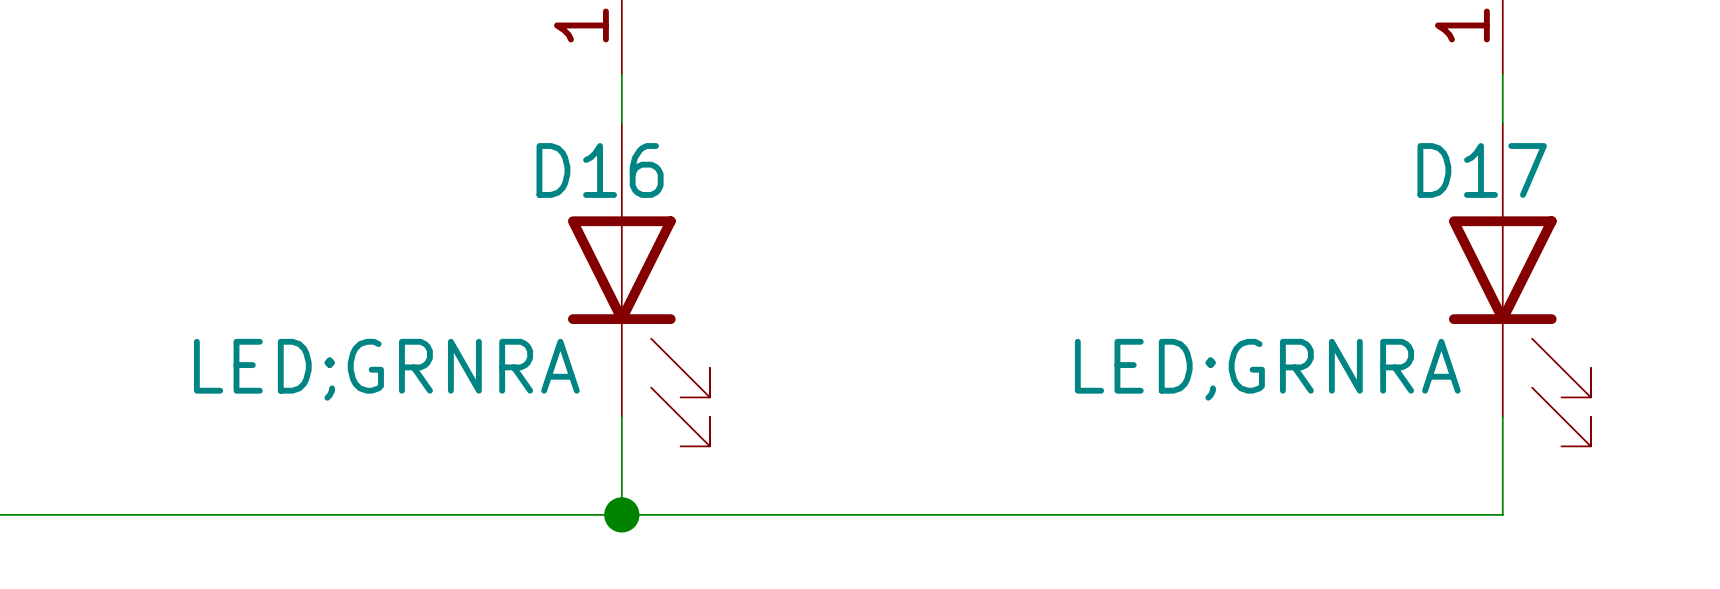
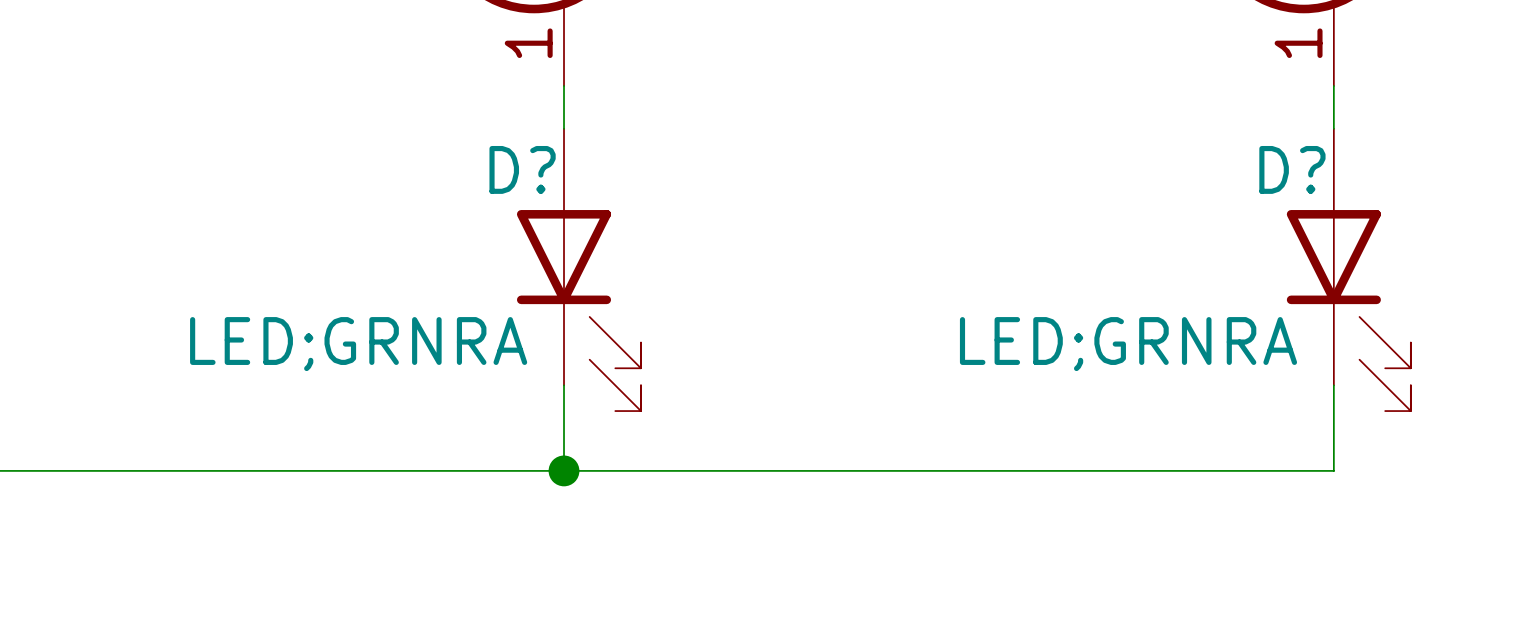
D16 name: D16 (600, 170) -> D? (522, 169)
D17 name: D17 (1482, 170) -> D? (1292, 169)

